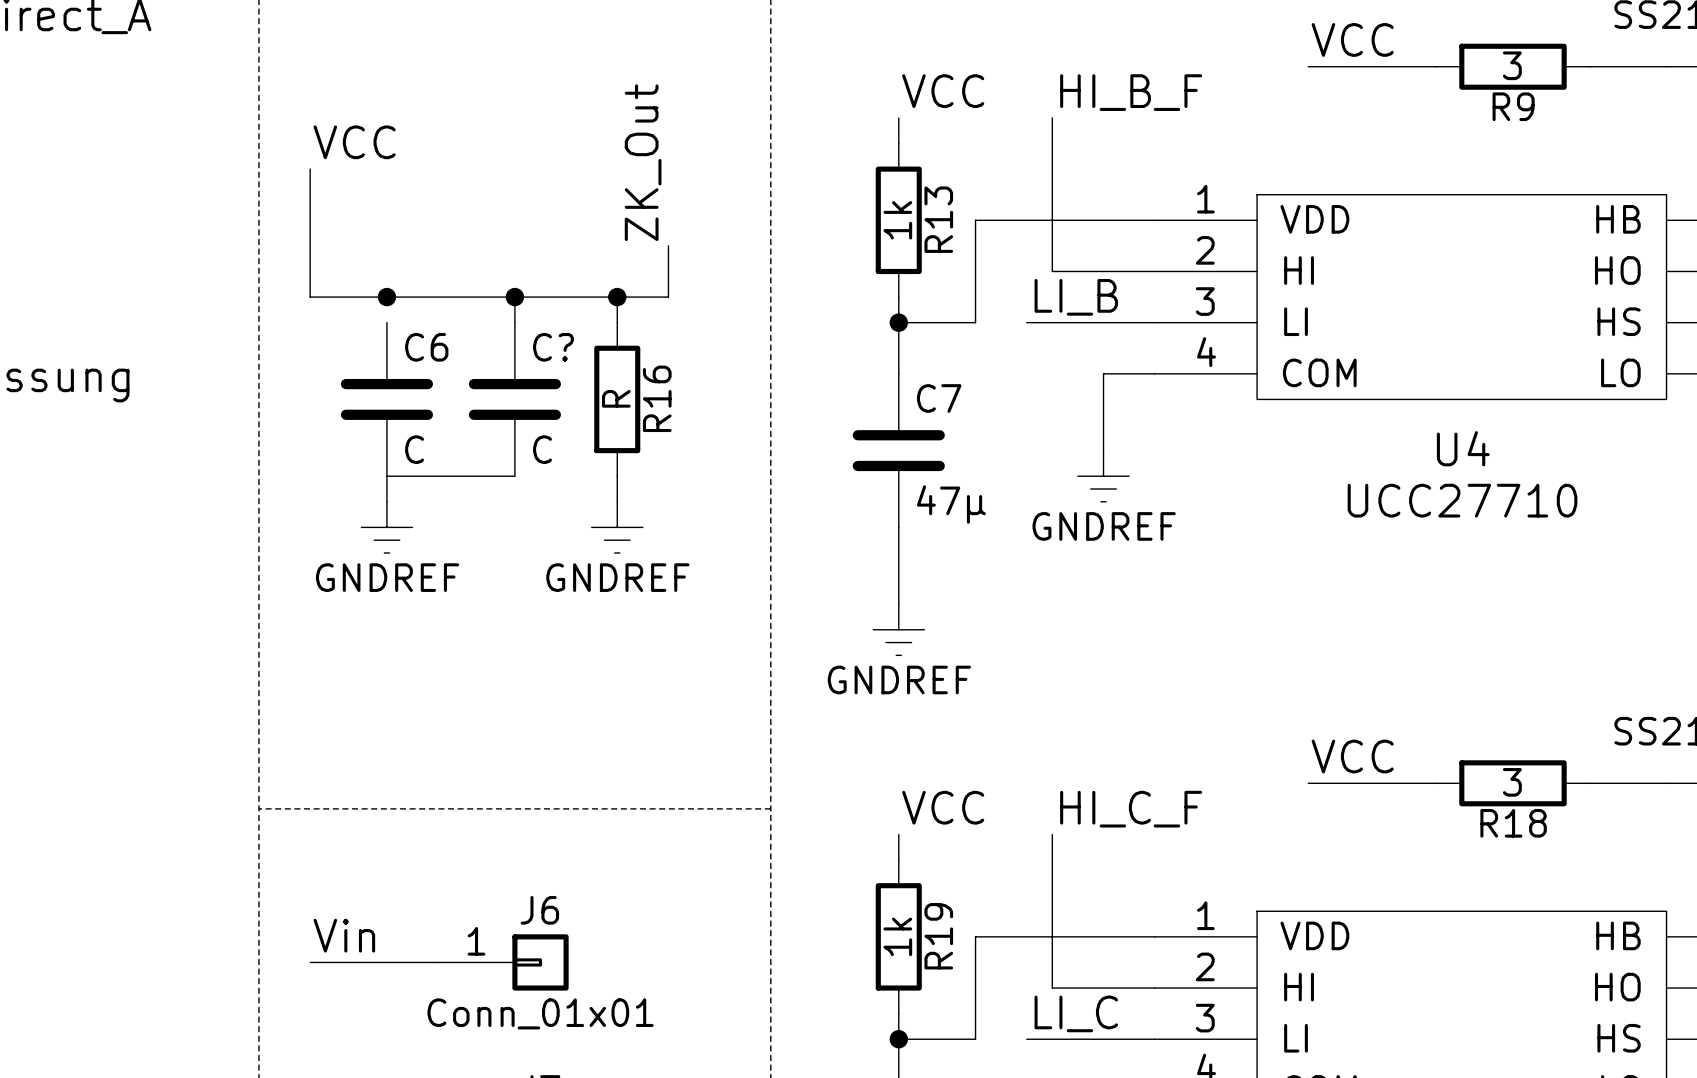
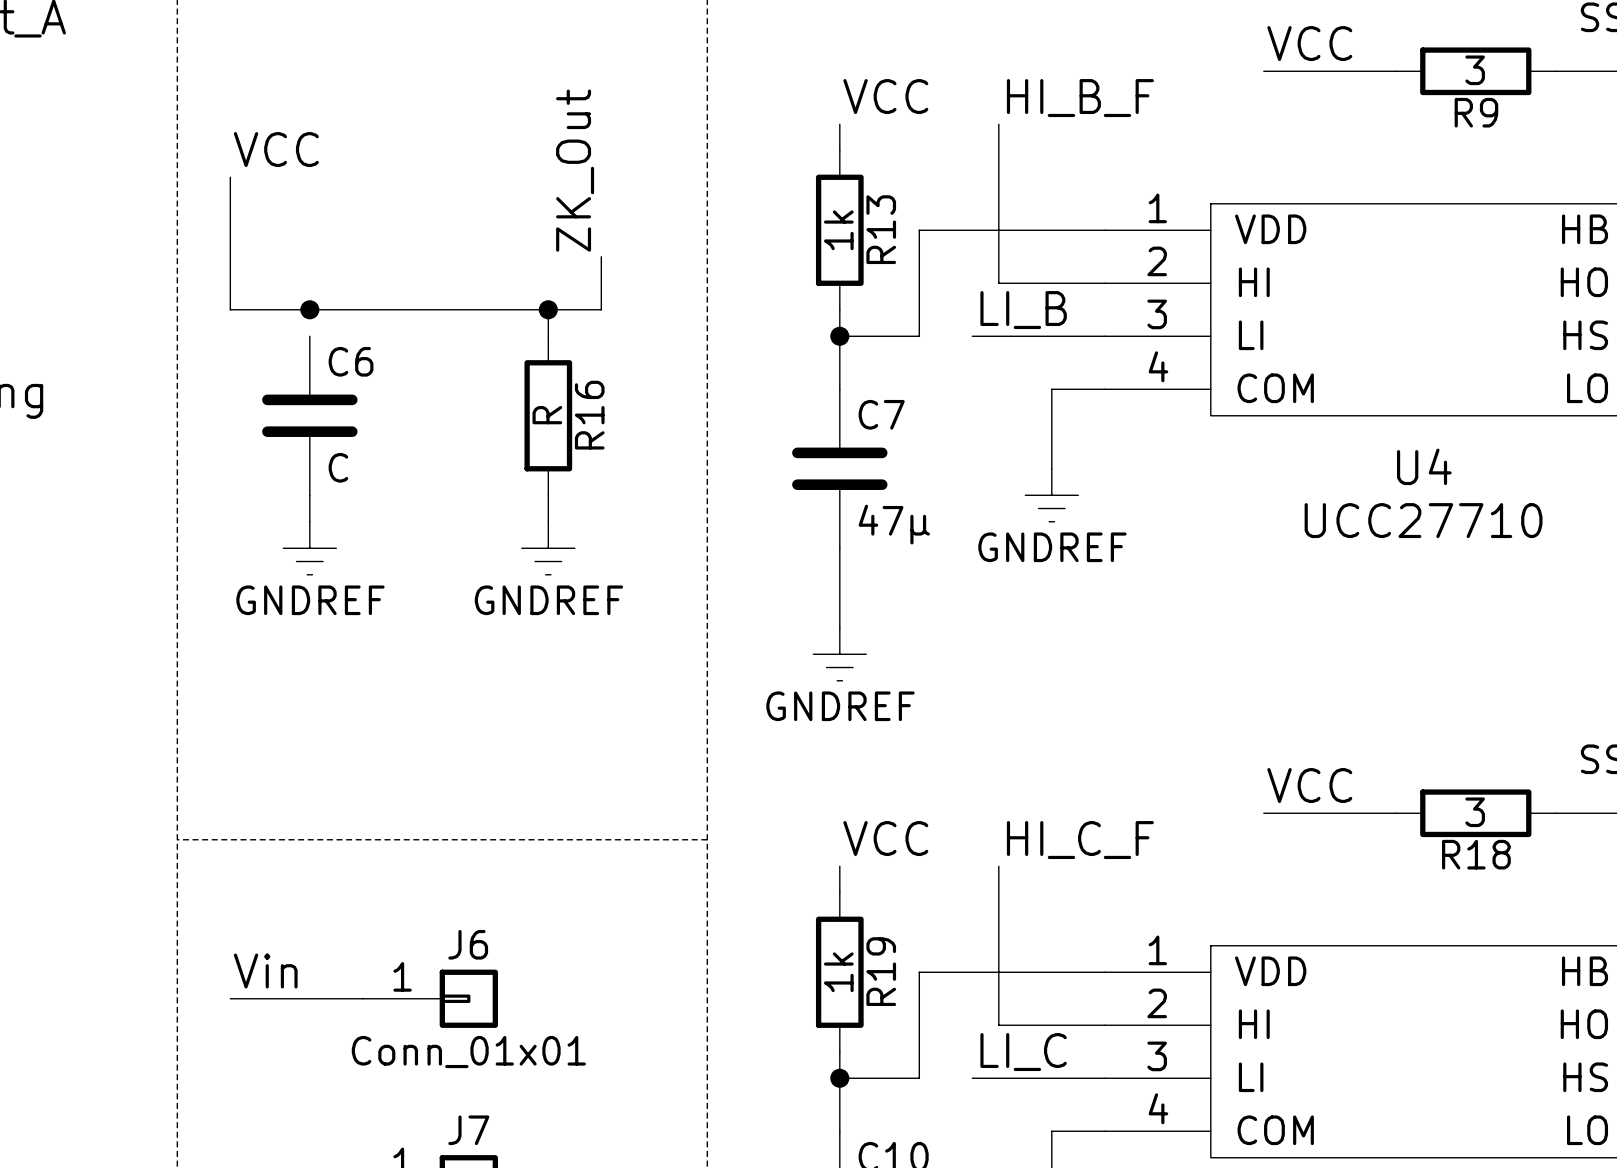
wire: (514, 297) (514, 322) -> none
junction: (514, 297) -> none
C?: C (514, 399) -> none
wire: (386, 476) (514, 476) -> none

